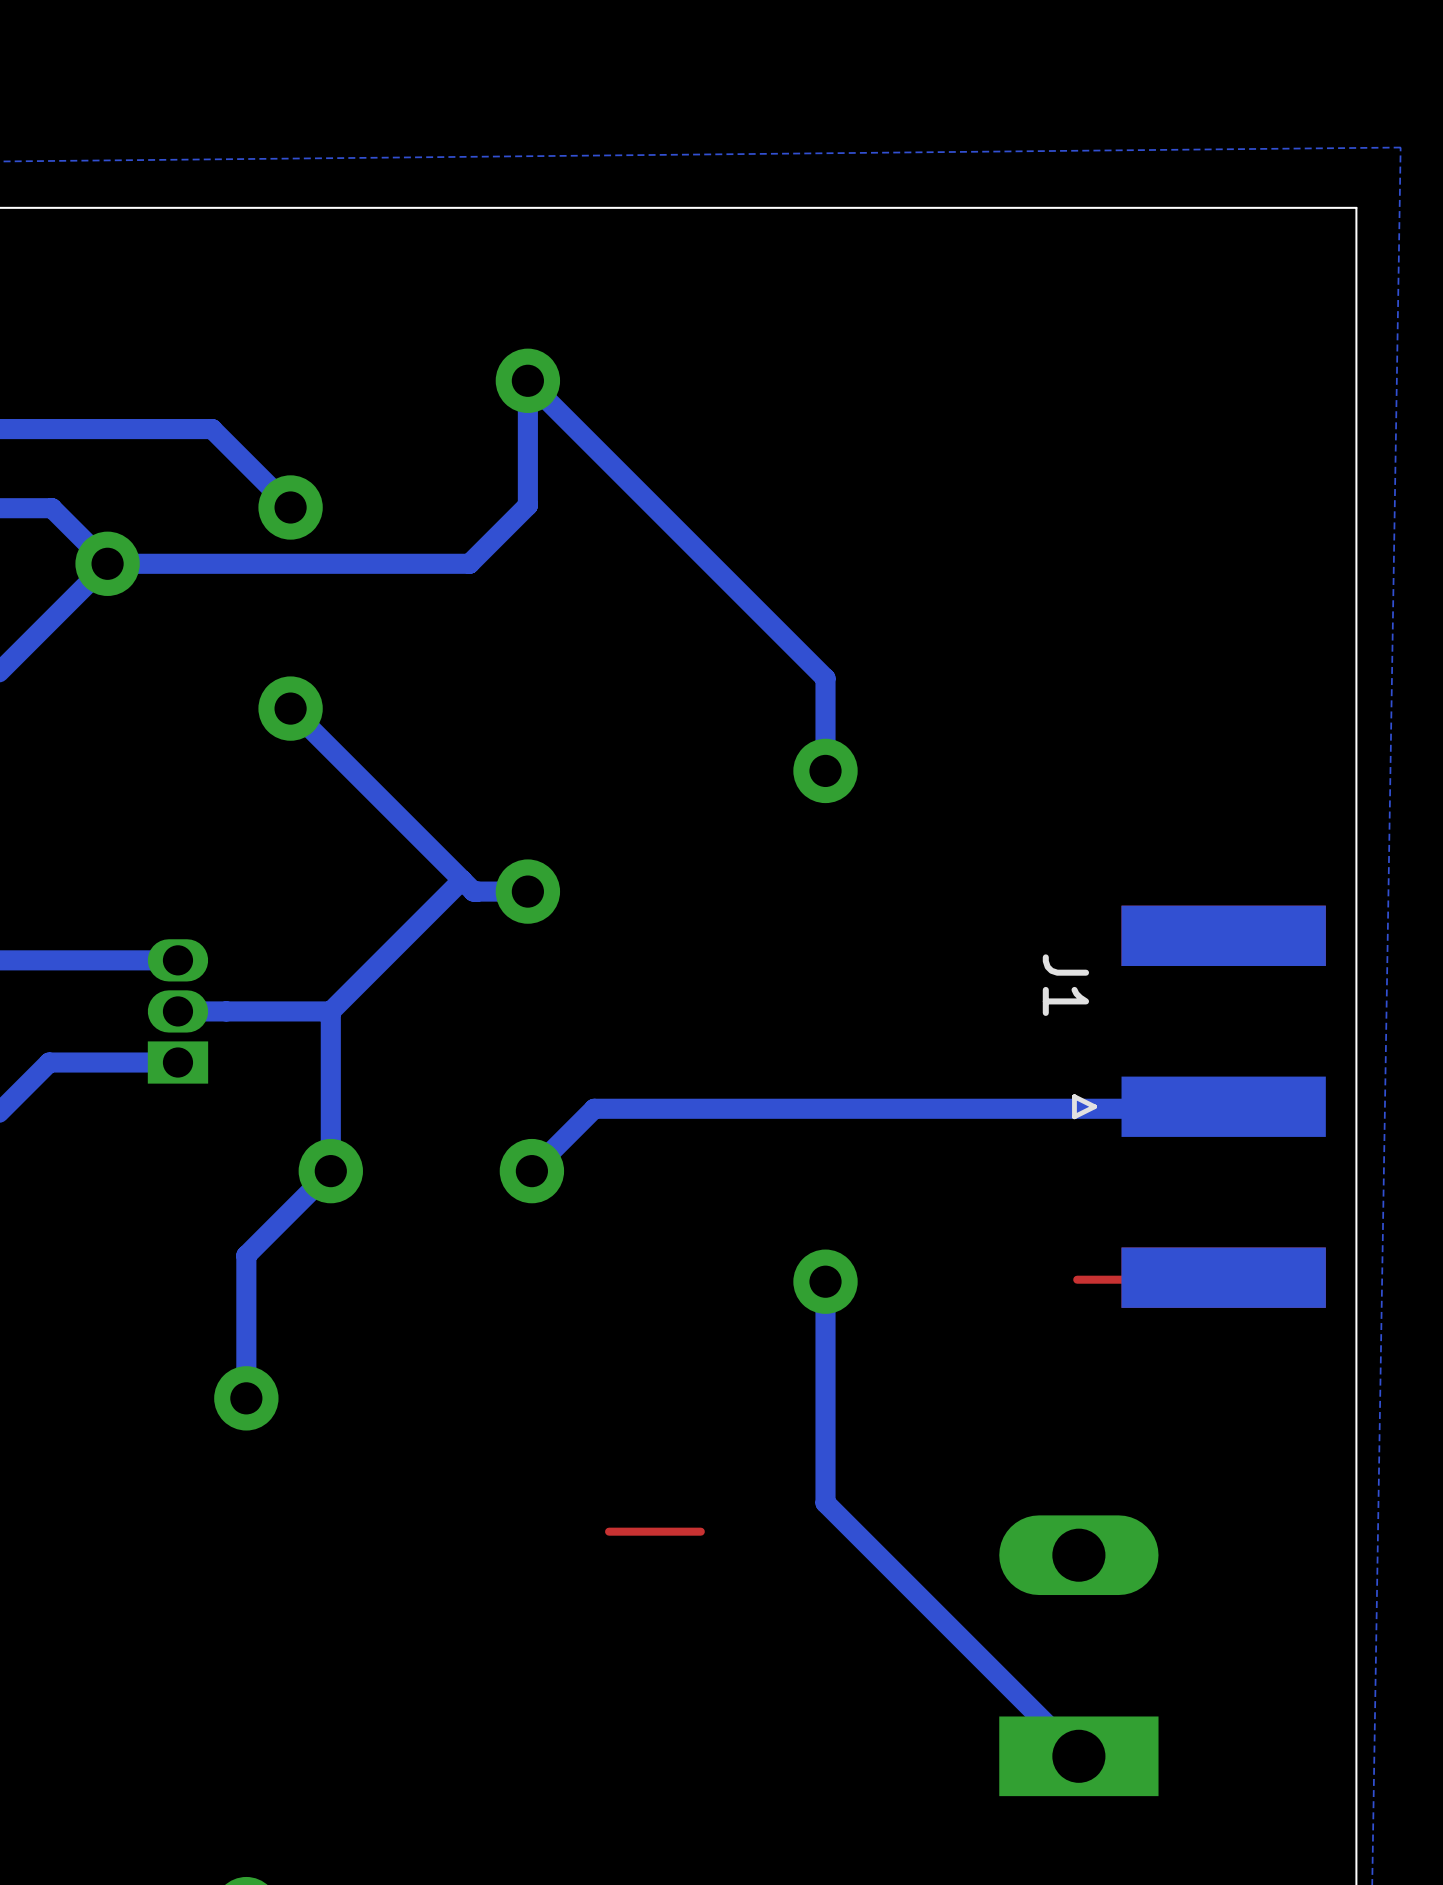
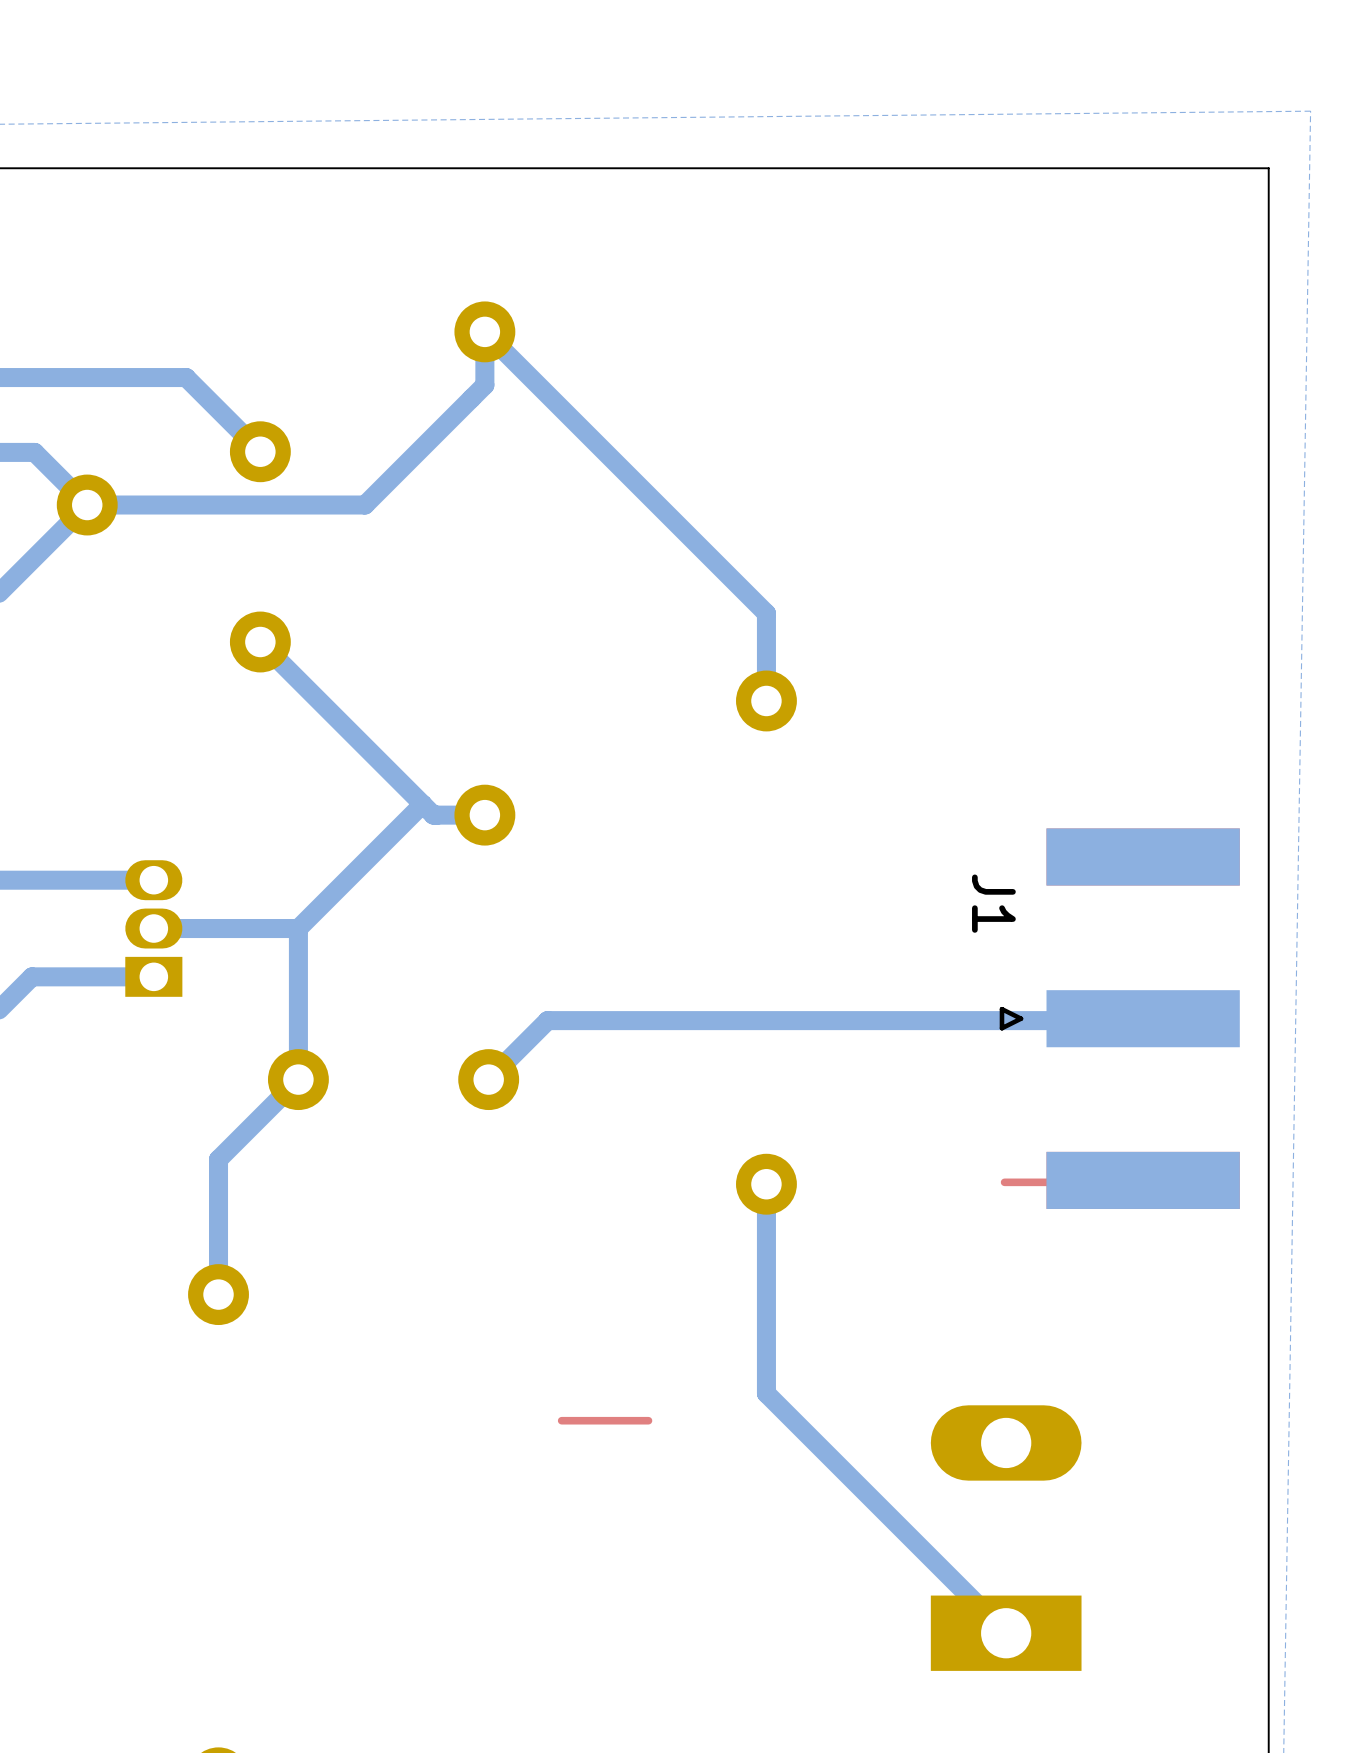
bottom track: (527, 437) (527, 505) (469, 563) (401, 563) -> (484, 385) (365, 505)

